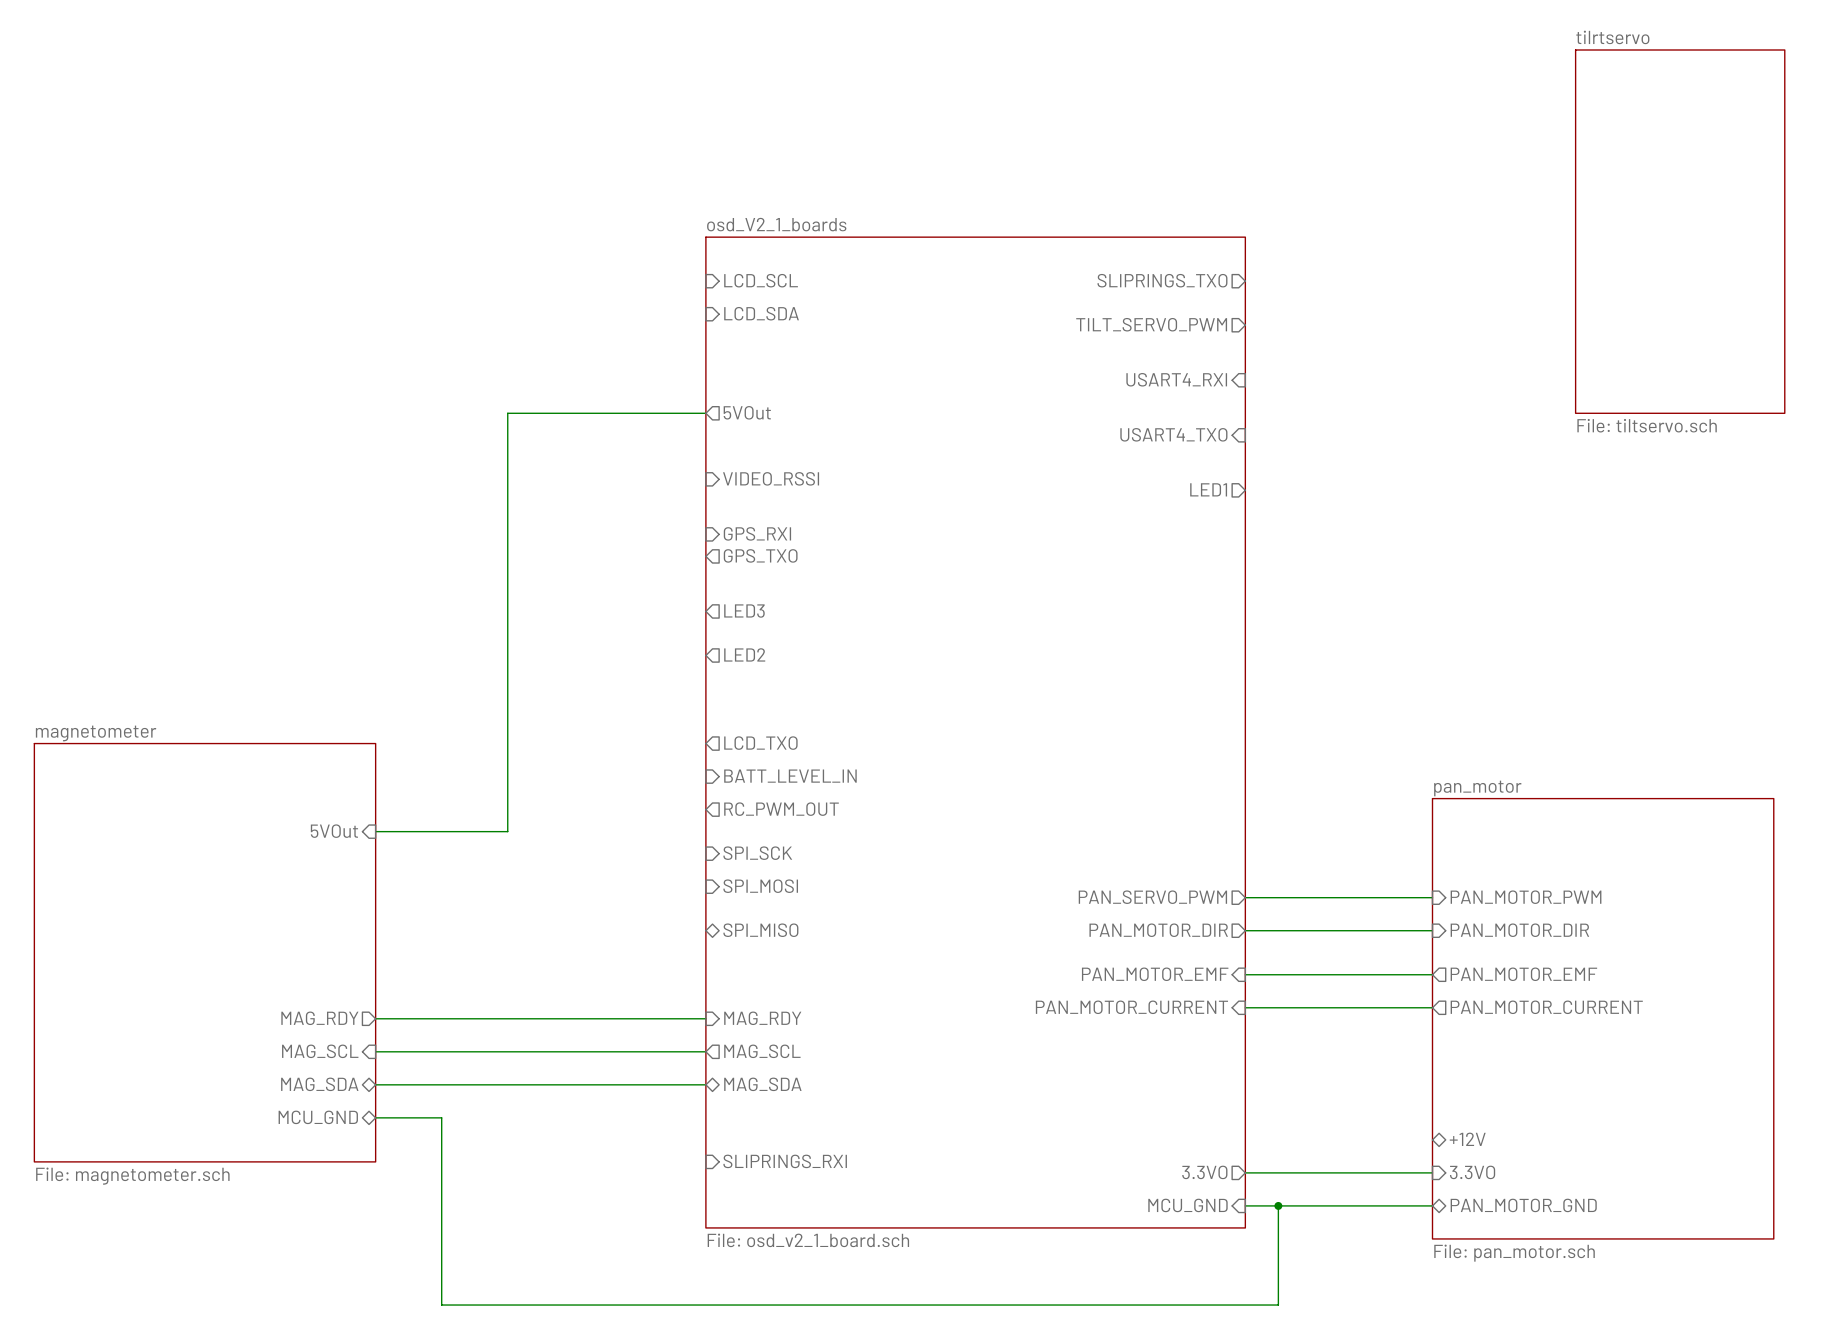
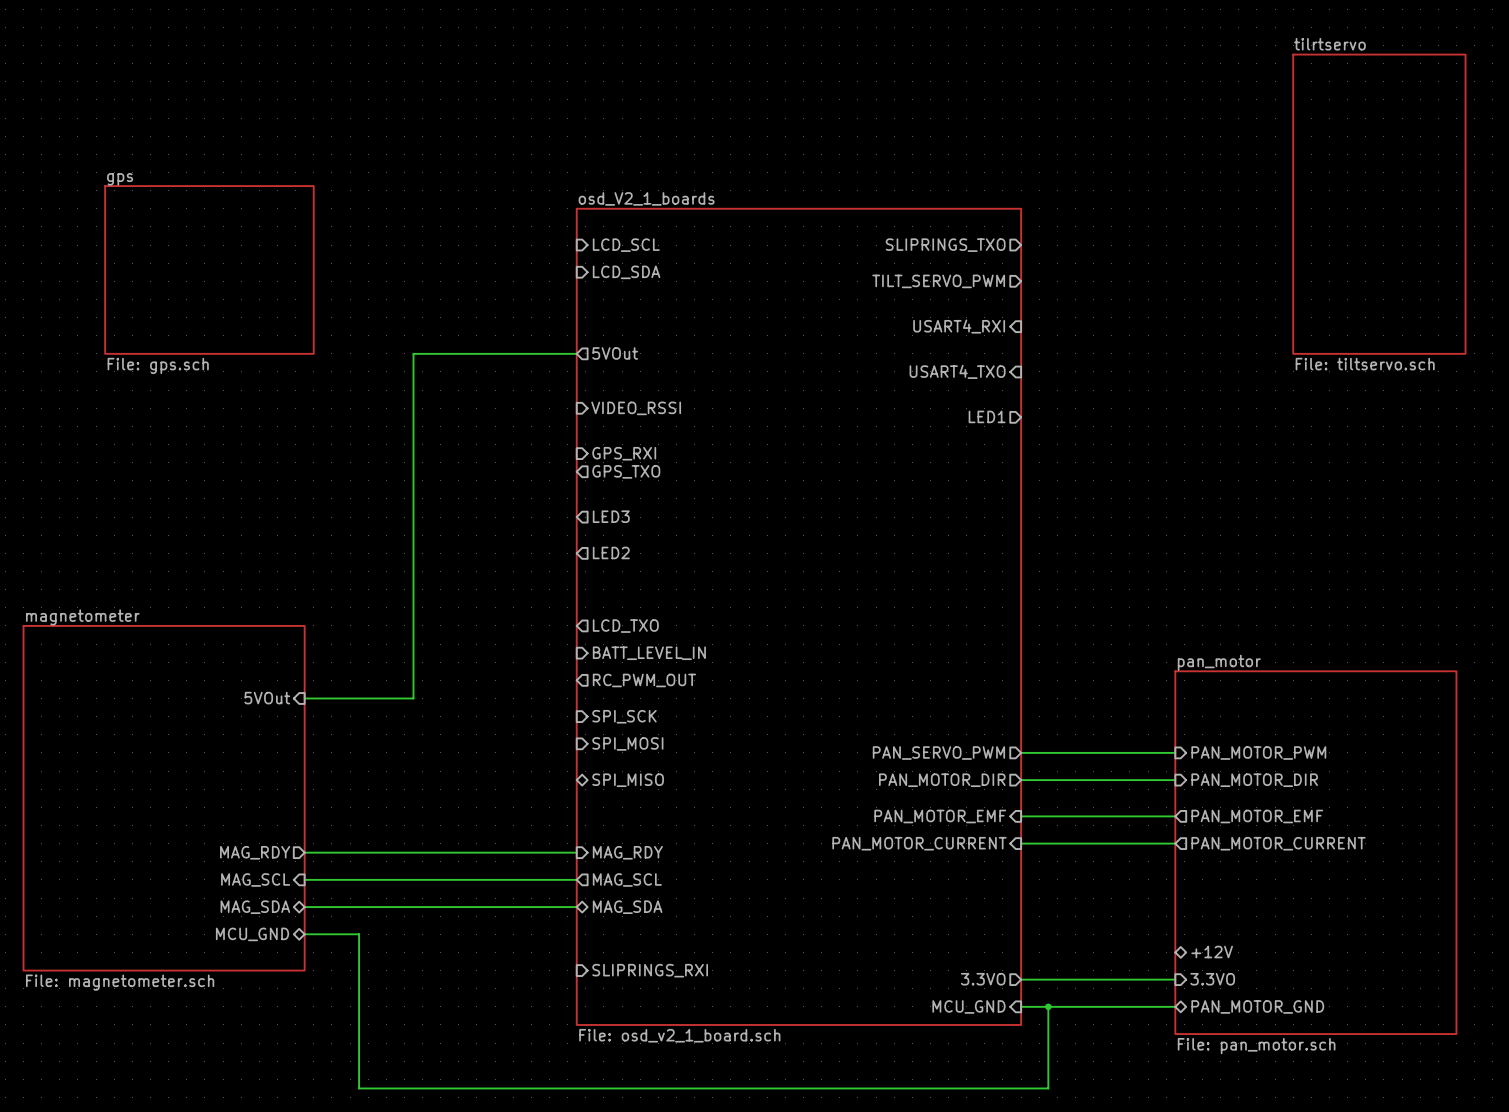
sheet gps: none -> File: gps.sch (209, 269)

